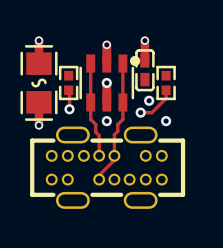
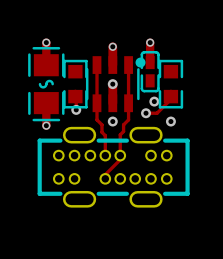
part footprint: [58, 65, 79, 101] -> [63, 59, 88, 109]
part footprint: [156, 65, 176, 101] -> [158, 59, 184, 109]

